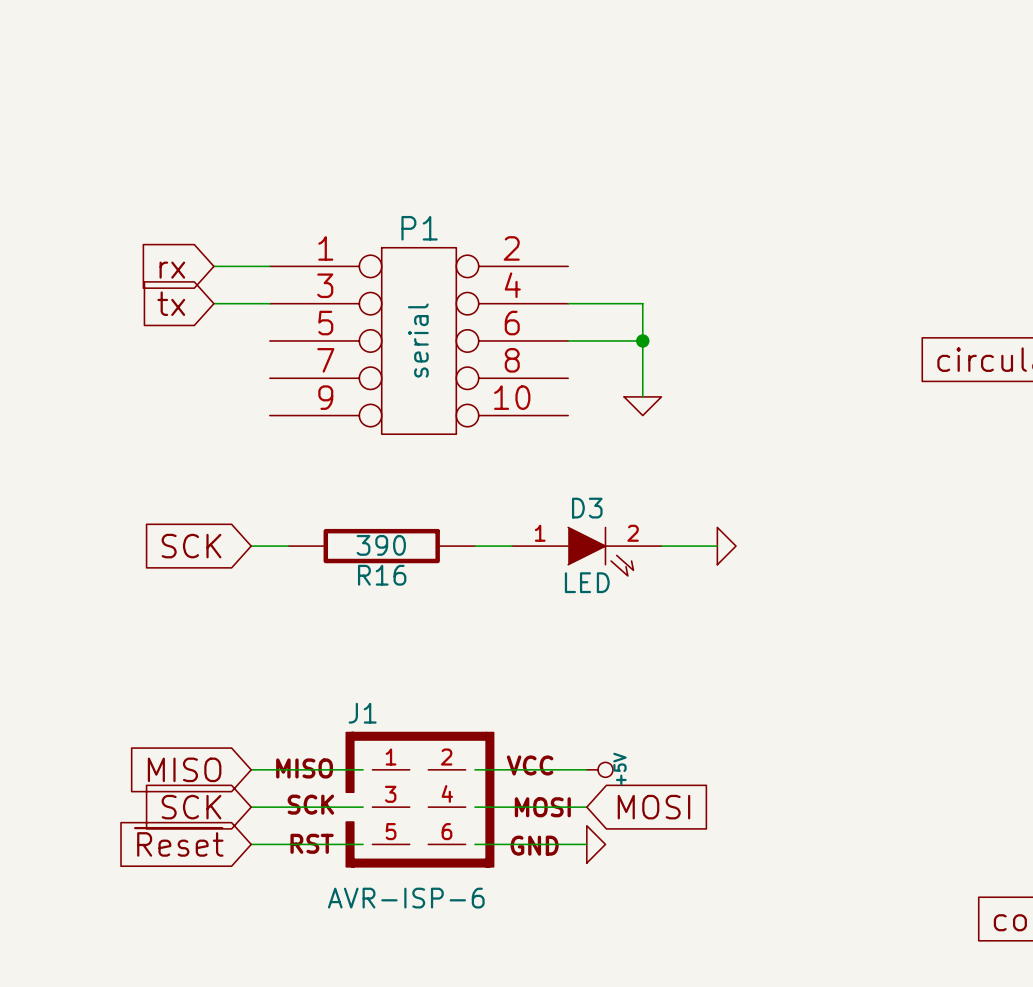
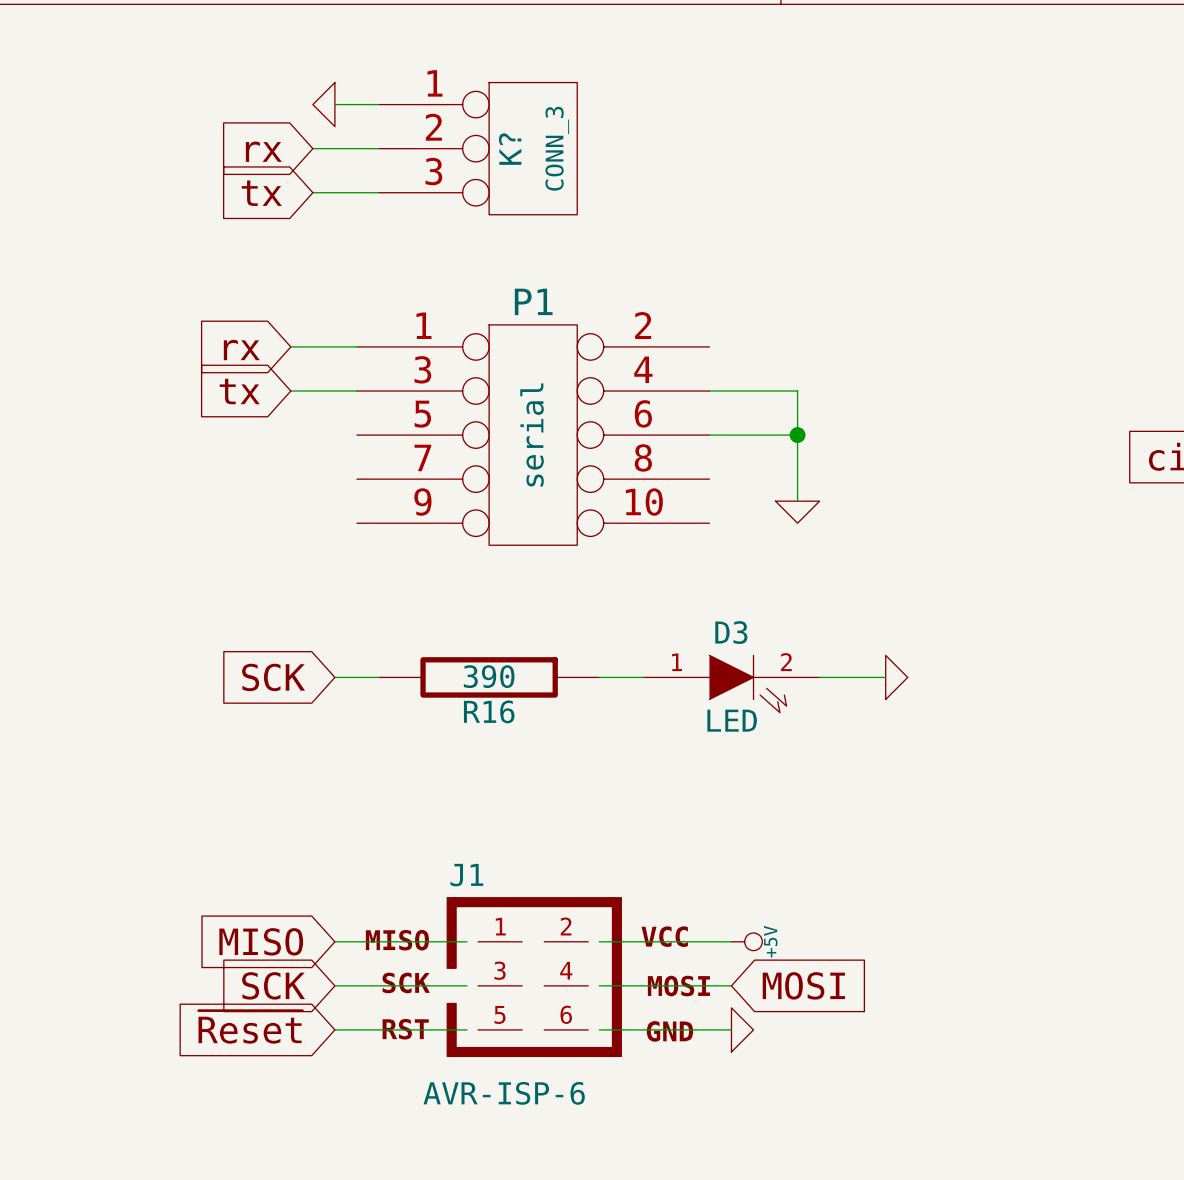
power symbol: none -> (323, 104)
wire: none -> (334, 104) (378, 104)
wire: none -> (312, 148) (378, 148)
K?: none -> CONN_3 (478, 148)
global label: none -> rx (263, 151)
global label: none -> tx (261, 193)
wire: none -> (312, 192) (378, 192)

